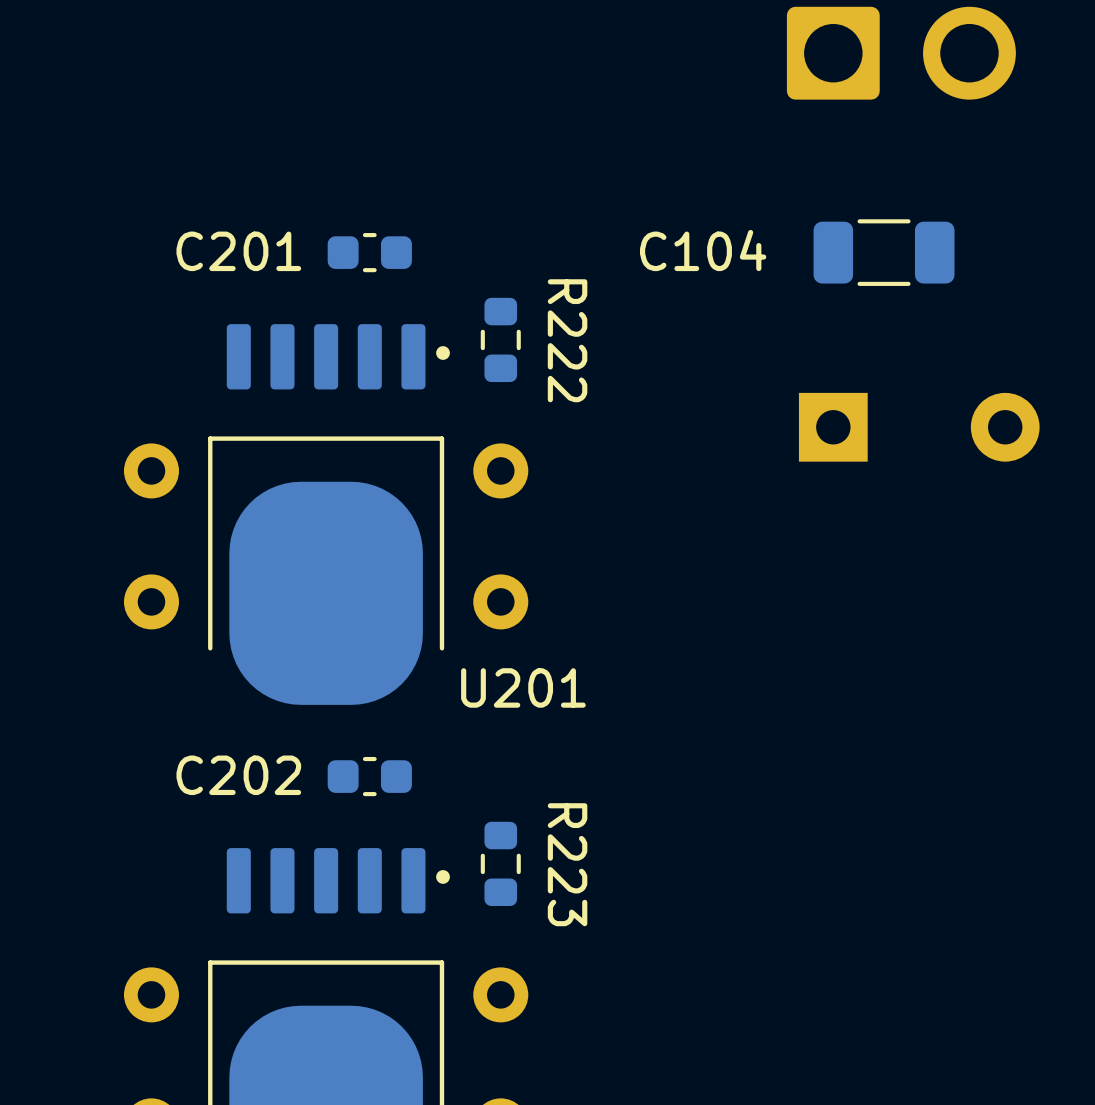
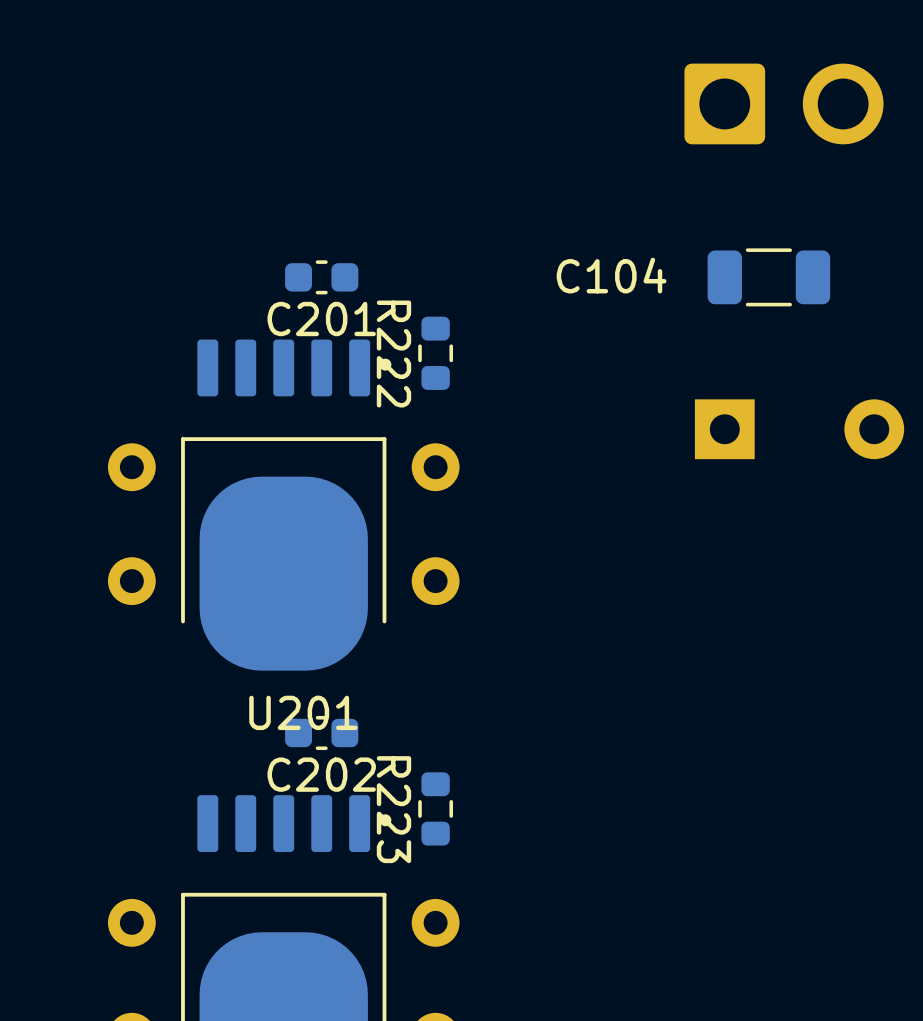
C201 name position: C201 (238, 251) -> C201 (321, 319)
R222 name position: R222 (567, 340) -> R222 (393, 354)
U201 name position: U201 (523, 687) -> U201 (303, 712)
C202 name position: C202 (238, 775) -> C202 (321, 774)
R223 name position: R223 (567, 864) -> R223 (393, 809)

